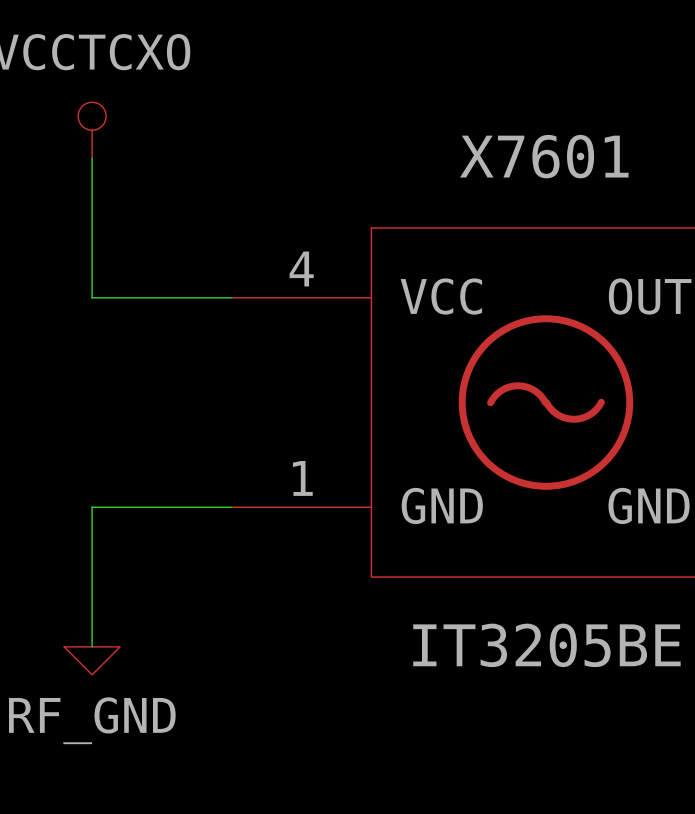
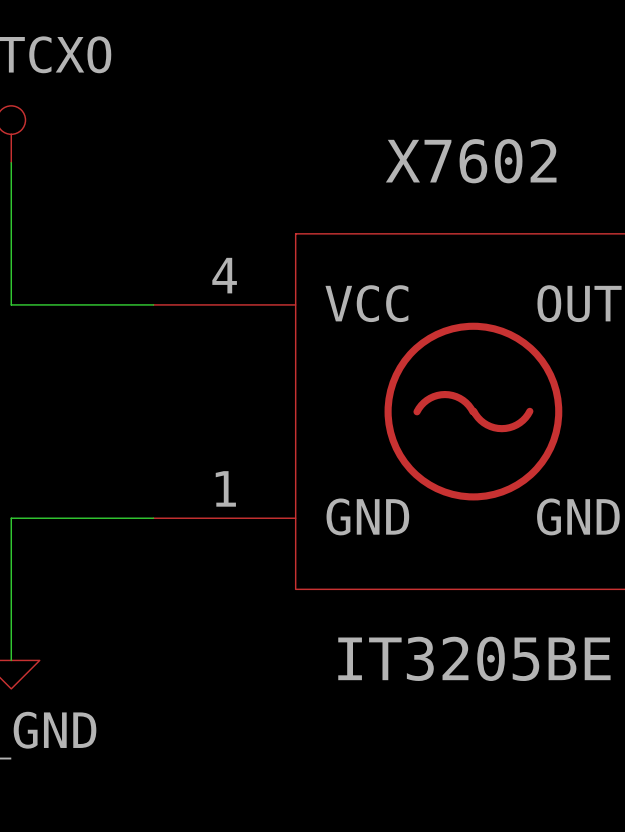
X7601 name: X7601 (544, 156) -> X7602 (471, 161)

